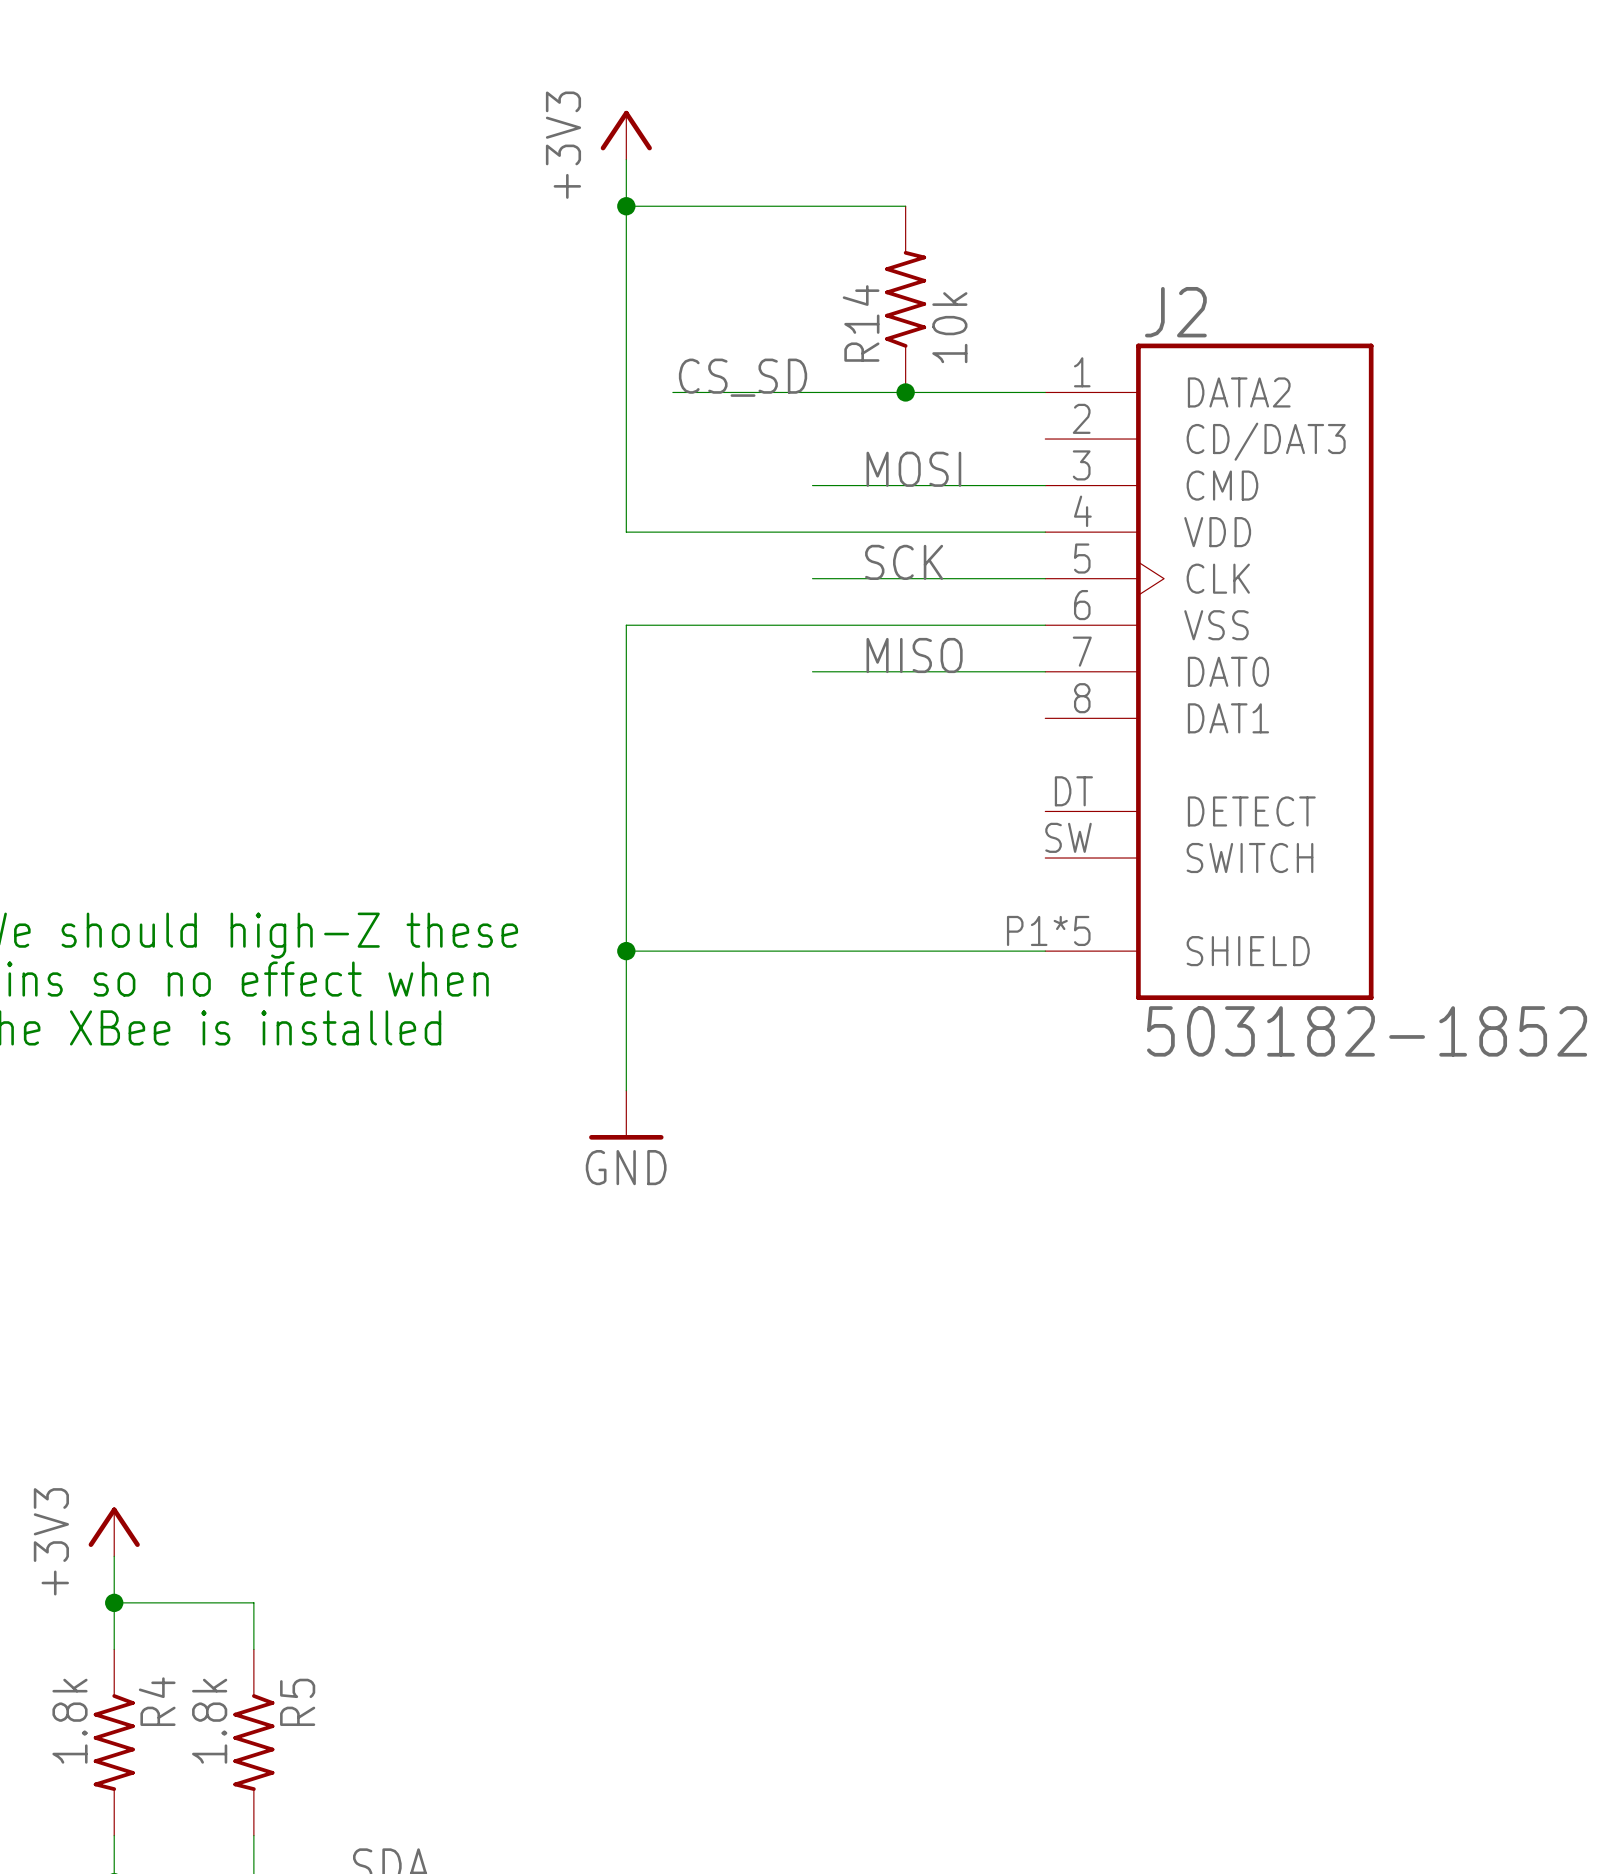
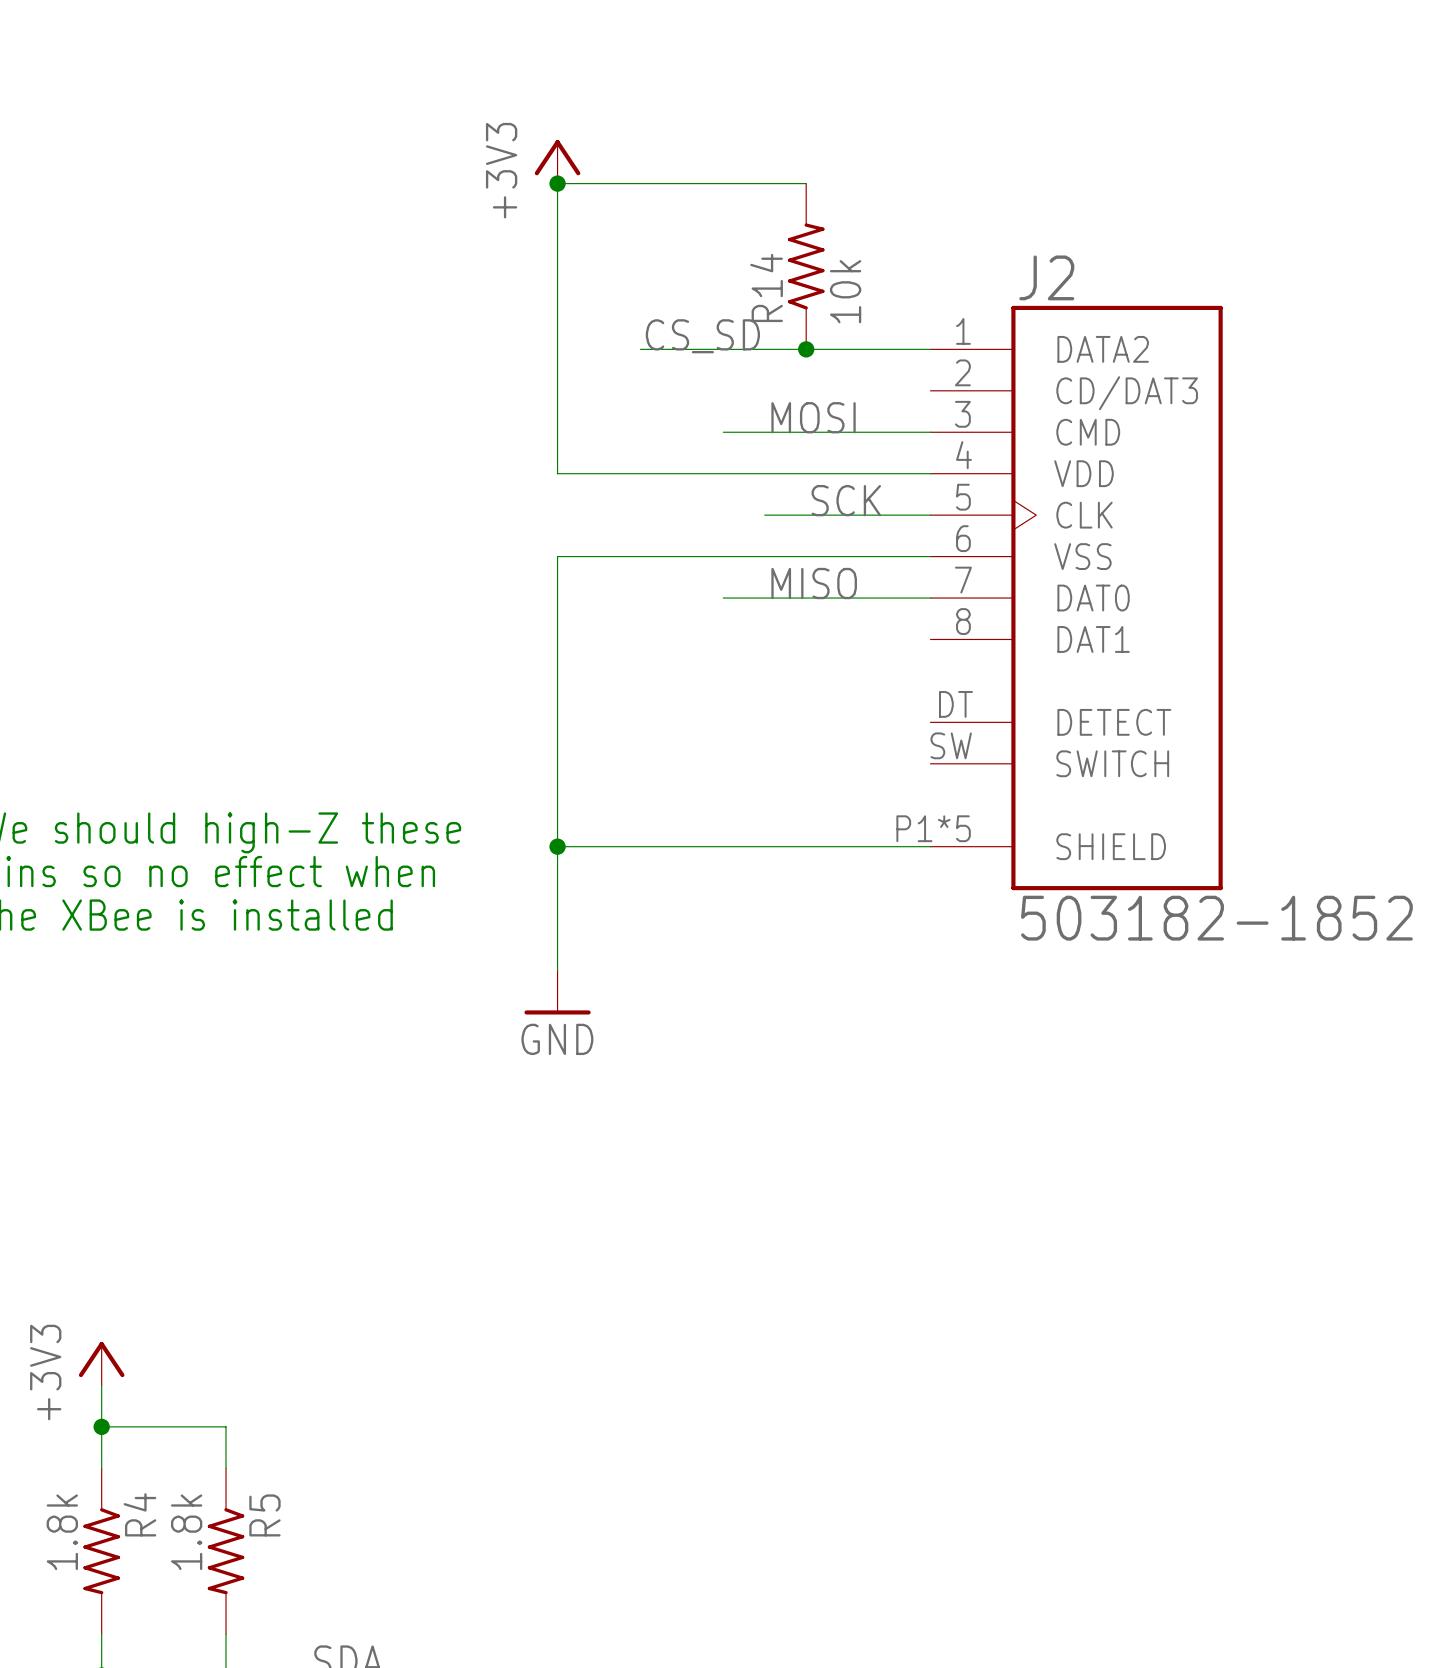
power symbol position: +3V3 (626, 135) -> +3V3 (557, 161)
label position: CS_SD (743, 377) -> CS_SD (702, 336)
wire: (672, 392) (719, 392) -> none
label position: SCK (904, 562) -> SCK (846, 500)
wire: (812, 578) (859, 578) -> none

